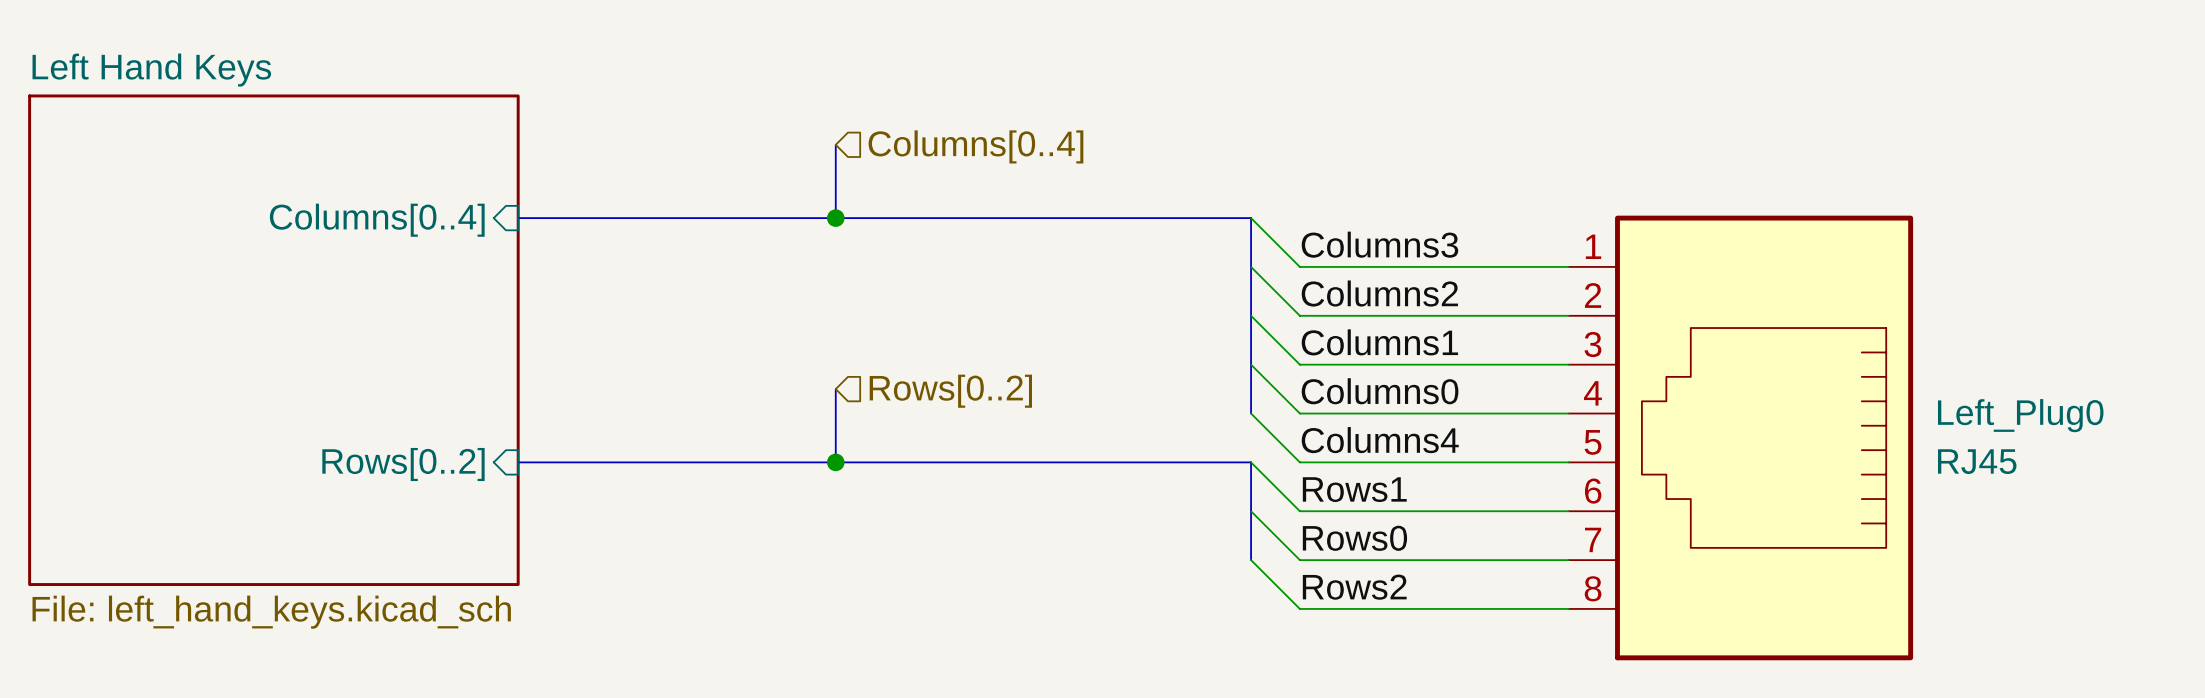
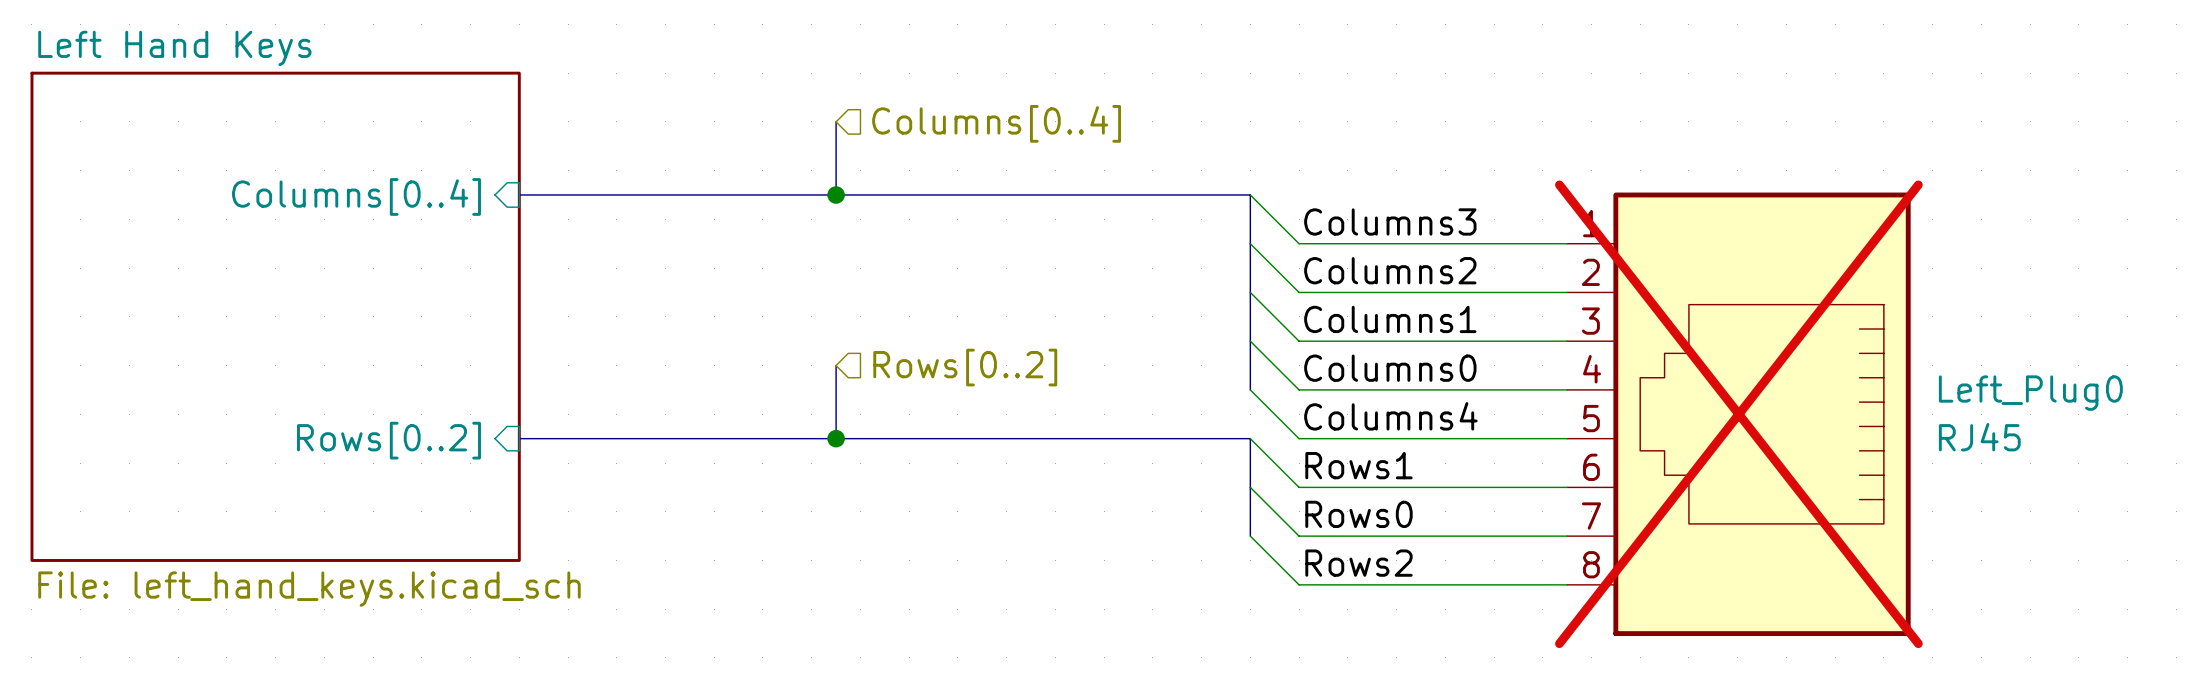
Left_Plug0 do-not-place cross: none -> (1738, 414)

